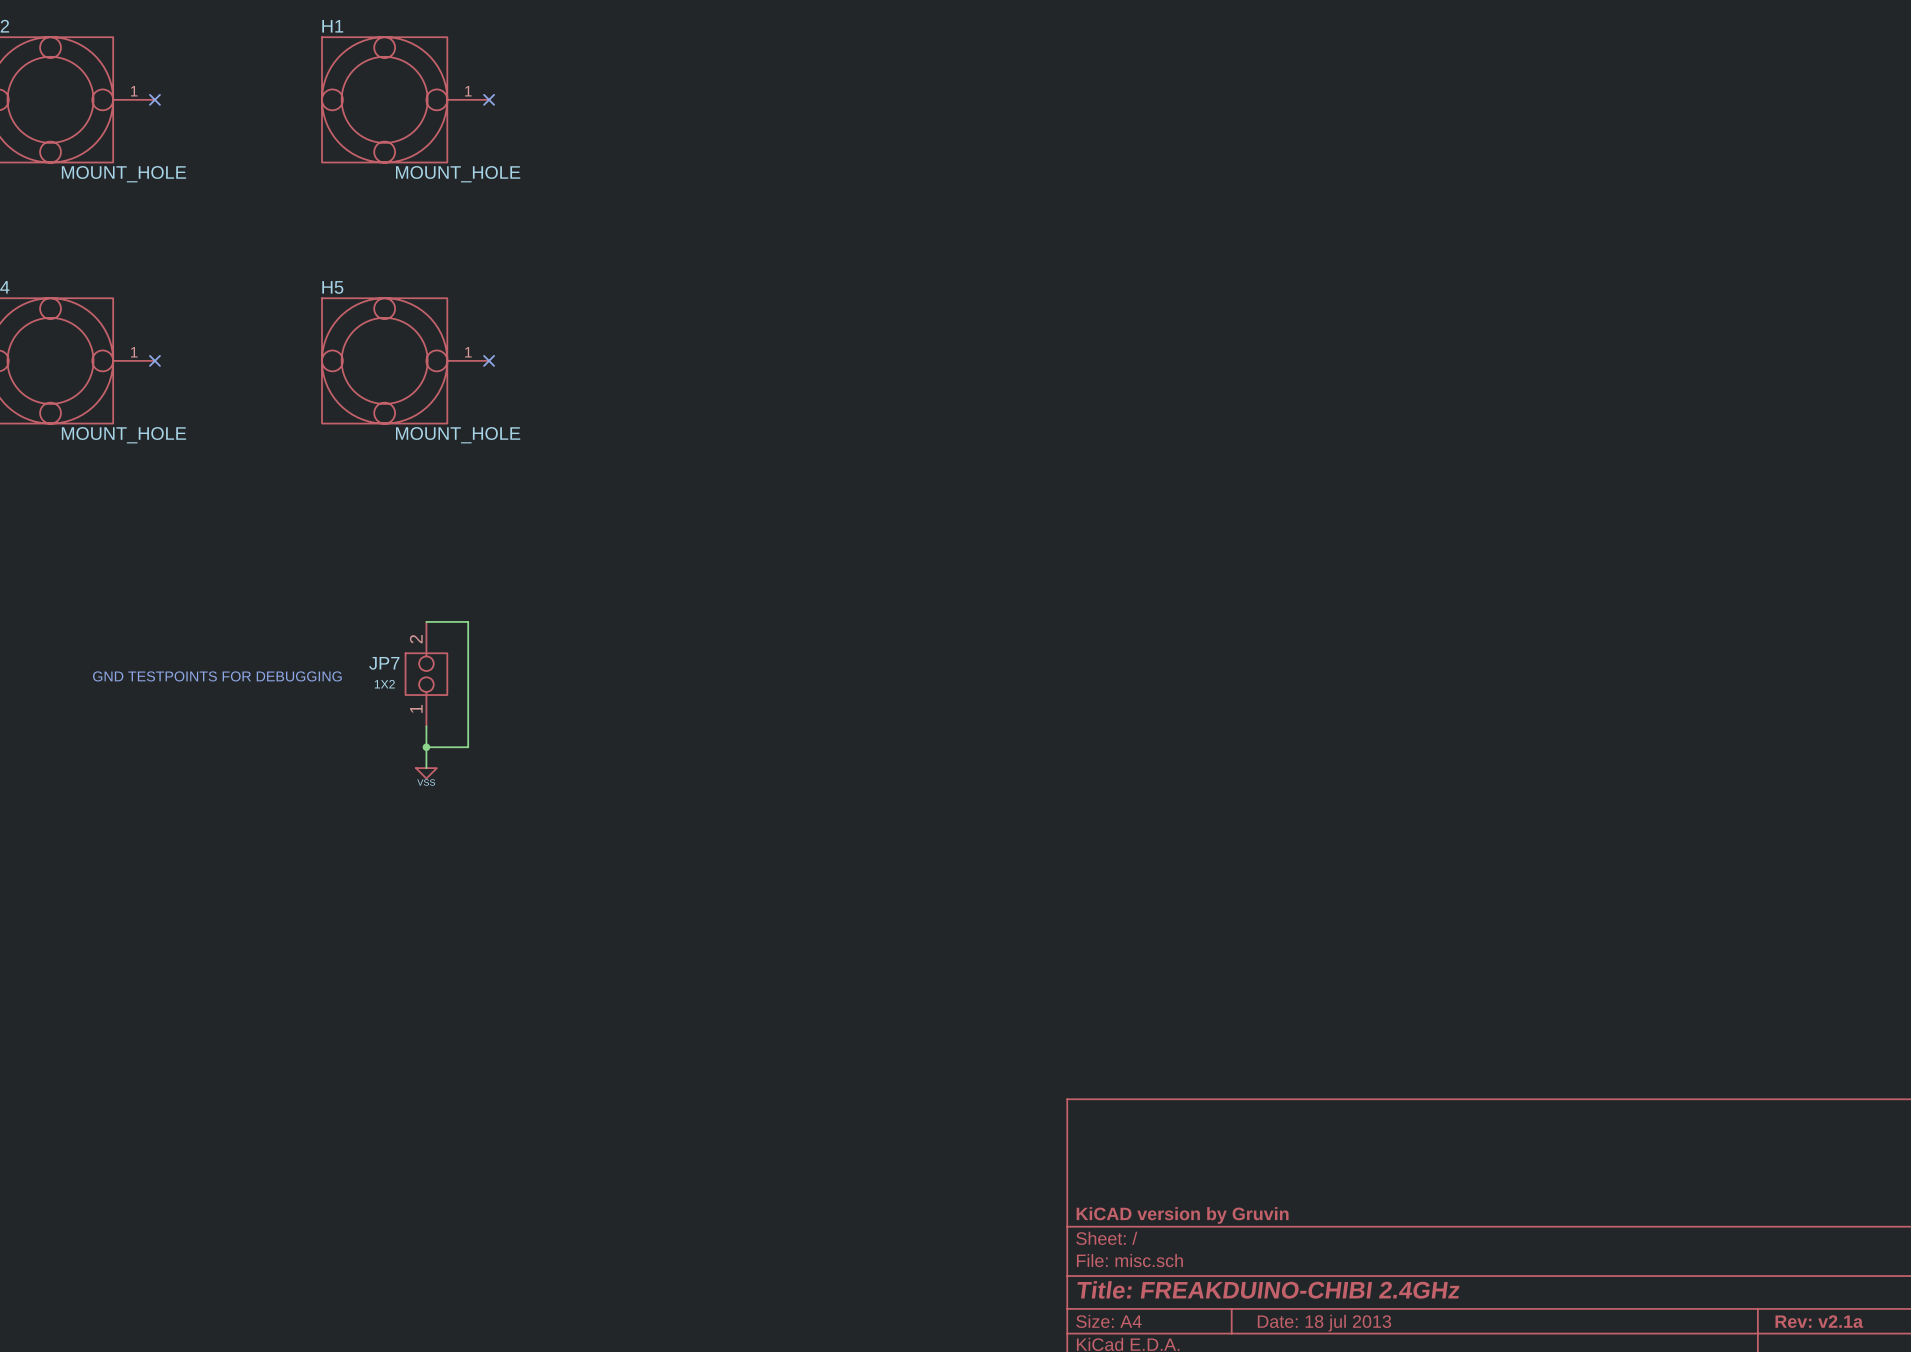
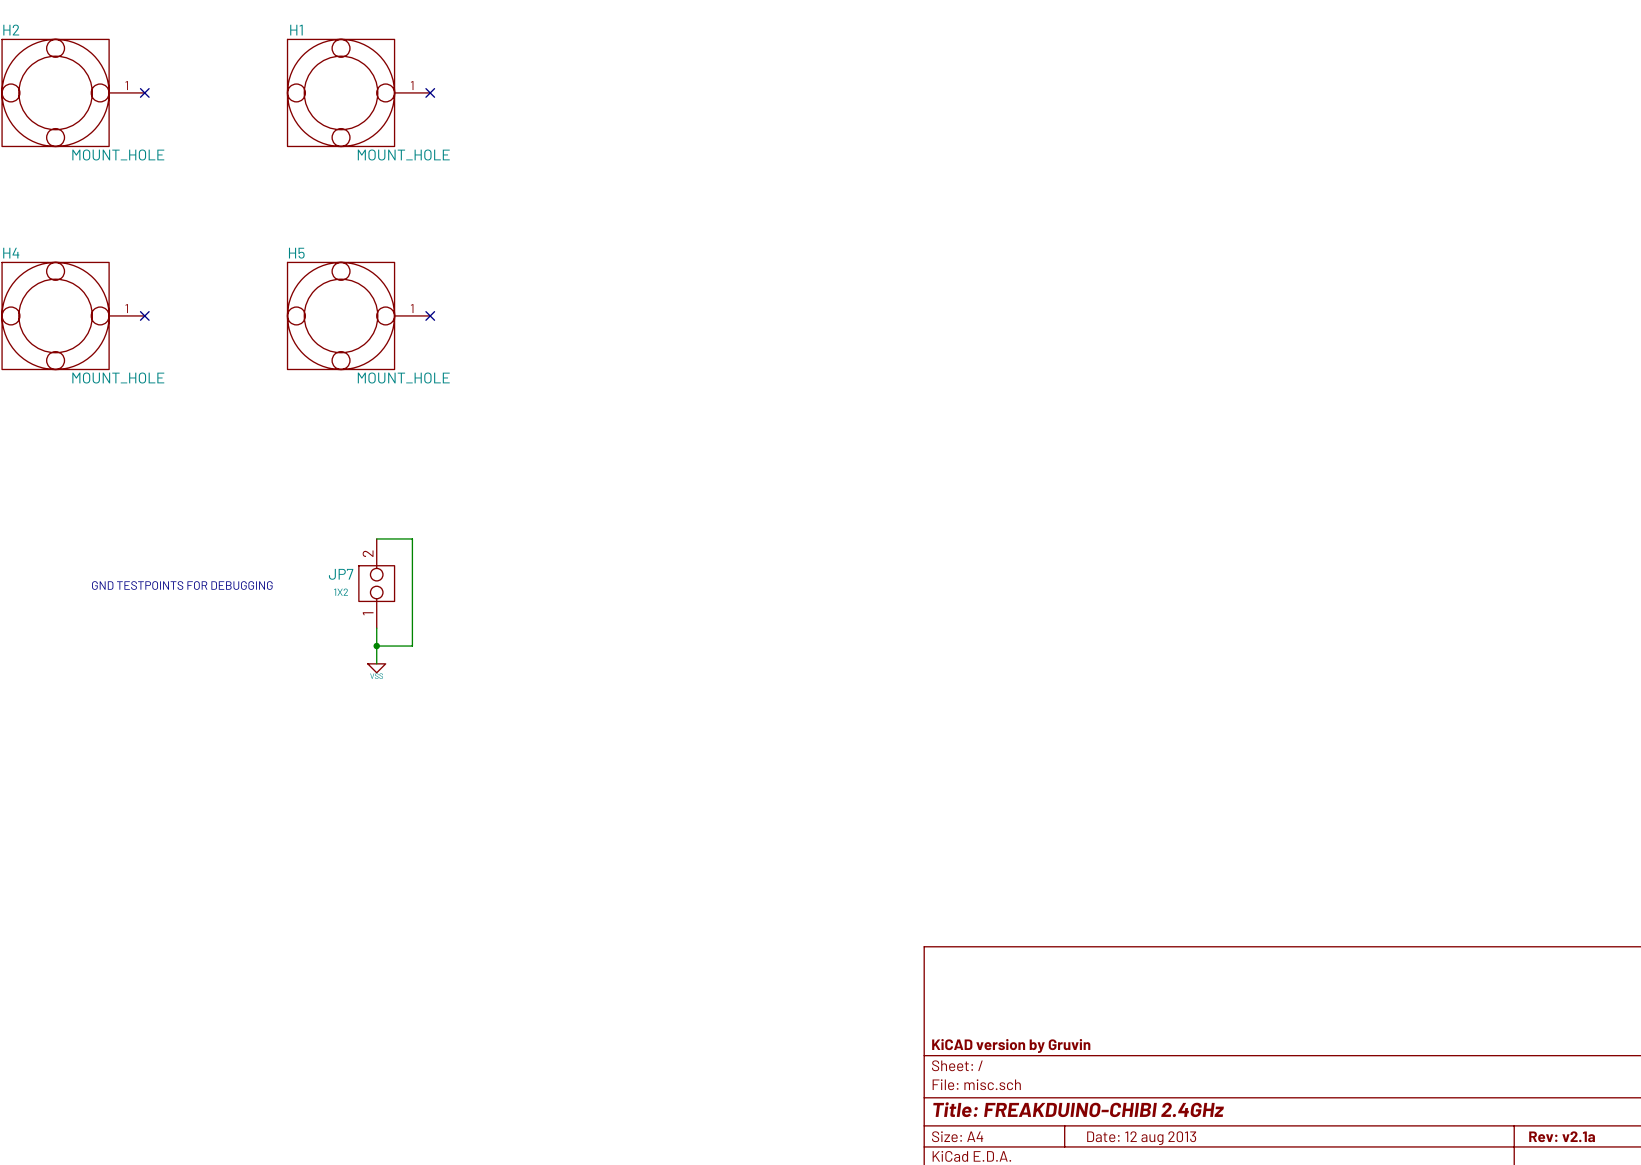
title block: Date: 18 jul 2013 (1324, 1323) -> Date: 12 aug 2013 (1141, 1138)

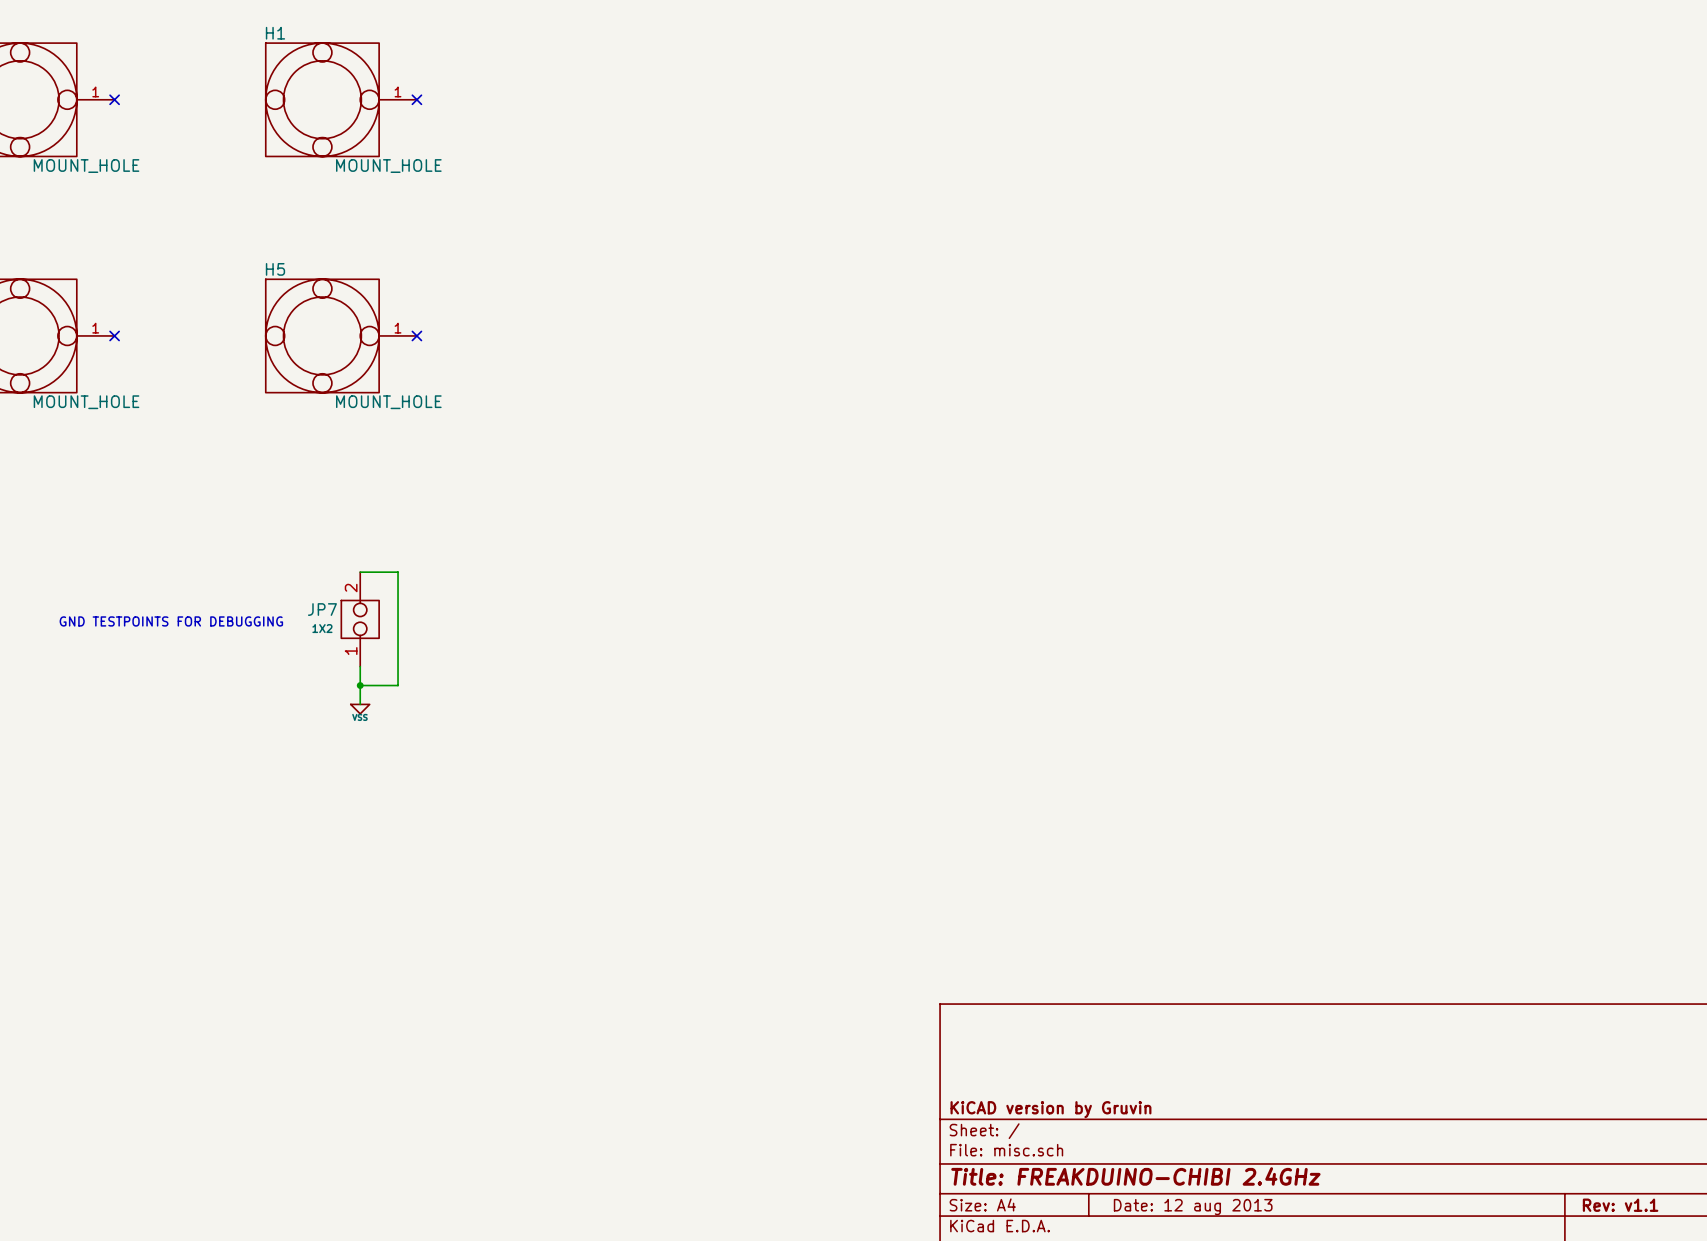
title block: Rev: v2.1a (1562, 1136) -> Rev: v1.1 (1620, 1205)

